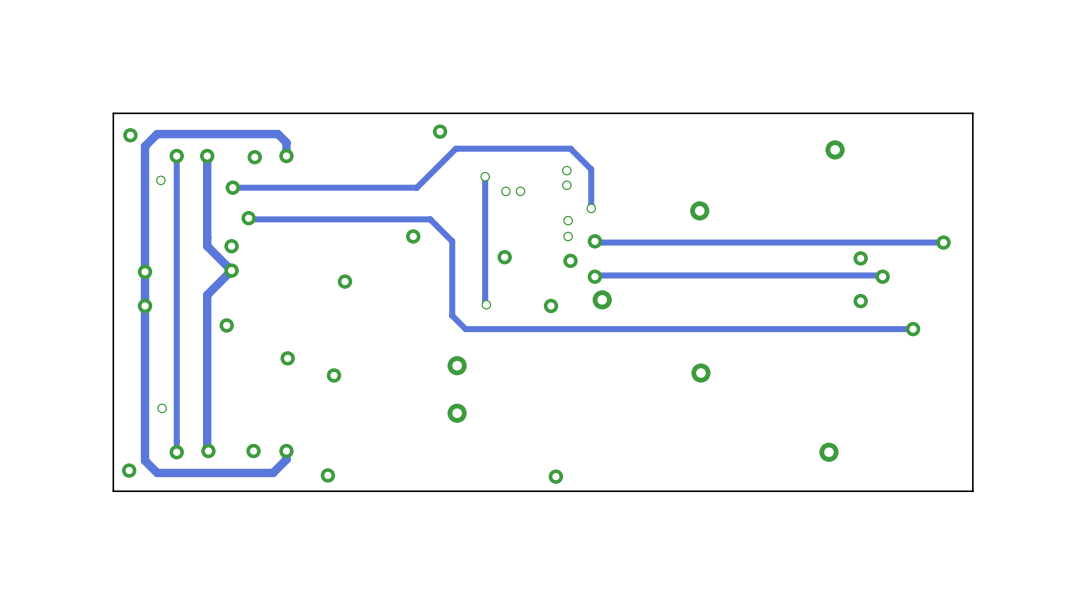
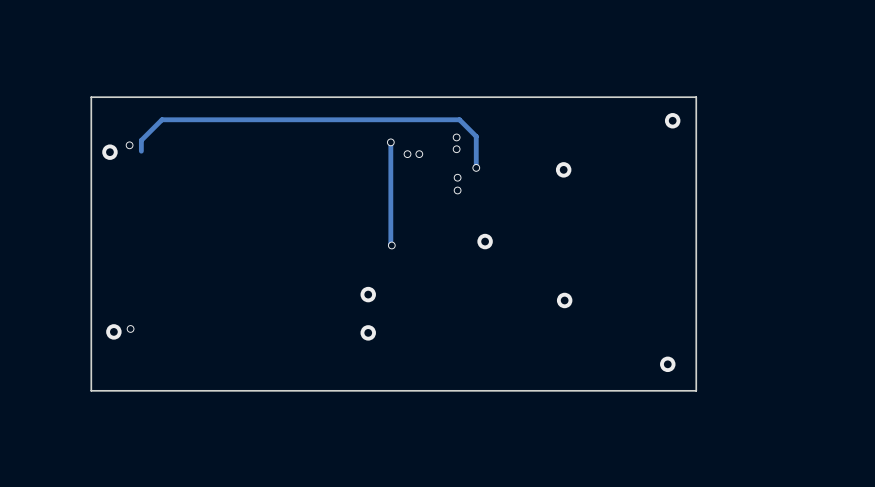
board edge: (113, 120) (113, 113) (972, 113) (972, 491) (113, 491) (113, 485) -> (91, 97) (696, 97) (696, 390) (91, 390)
via: (440, 131) -> none
via: (130, 135) -> none
track: (455, 148) (416, 187) (232, 187) -> (367, 119) (162, 119) (141, 140) (141, 151)
track: (176, 156) (176, 451) -> none
via: (176, 156) -> none
track: (207, 156) (207, 246) (231, 270) (207, 294) (208, 449) -> none
via: (207, 156) -> none
track: (286, 156) (286, 142) (277, 134) (157, 134) (145, 146) (145, 460) (157, 472) (273, 472) (286, 459) (286, 449) -> none
via: (286, 156) -> none
via: (254, 157) -> none
via: (232, 187) -> none
via: none -> (109, 152)
track: (248, 218) (430, 219) (452, 241) (452, 315) (465, 329) (911, 329) -> none
via: (248, 218) -> none
via: (413, 236) -> none
via: (594, 241) -> none
track: (943, 242) (594, 242) -> none
via: (943, 242) -> none
via: (231, 246) -> none
via: (504, 257) -> none
via: (860, 258) -> none
via: (570, 260) -> none
via: (231, 270) -> none
via: (145, 271) -> none
track: (594, 275) (882, 276) -> none
via: (594, 276) -> none
via: (882, 276) -> none
via: (344, 281) -> none
via: (860, 301) -> none
via: (145, 305) -> none
via: (551, 305) -> none
via: (226, 325) -> none
via: (913, 329) -> none
via: (287, 358) -> none
via: (334, 375) -> none
via: none -> (113, 331)
via: (208, 451) -> none
via: (253, 451) -> none
via: (286, 451) -> none
via: (176, 452) -> none
via: (129, 470) -> none
via: (327, 475) -> none
via: (555, 476) -> none

